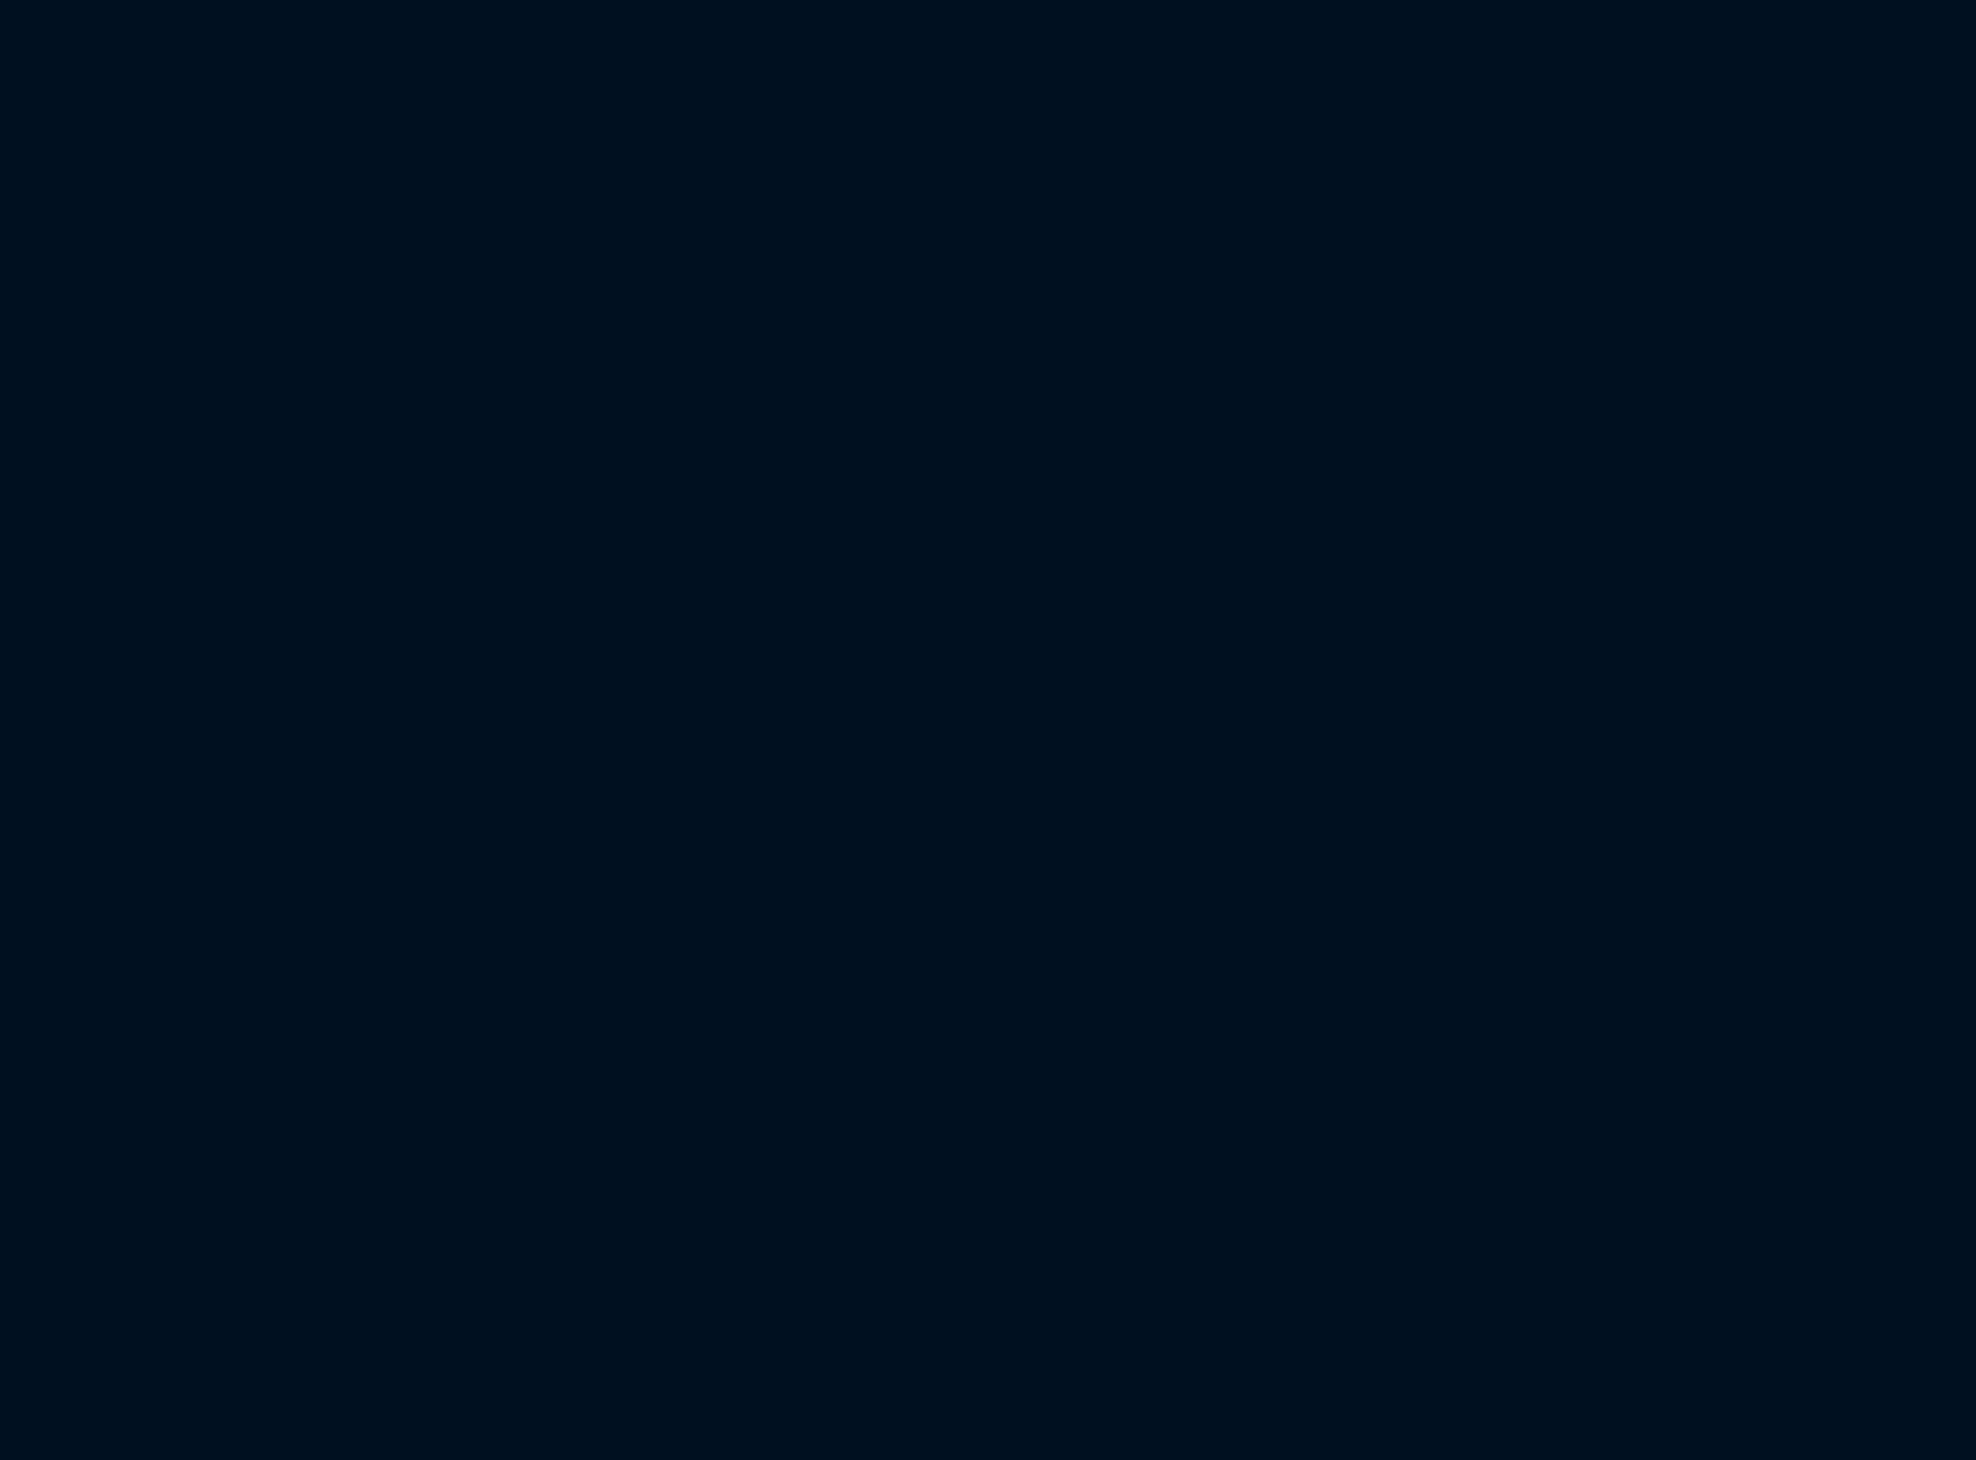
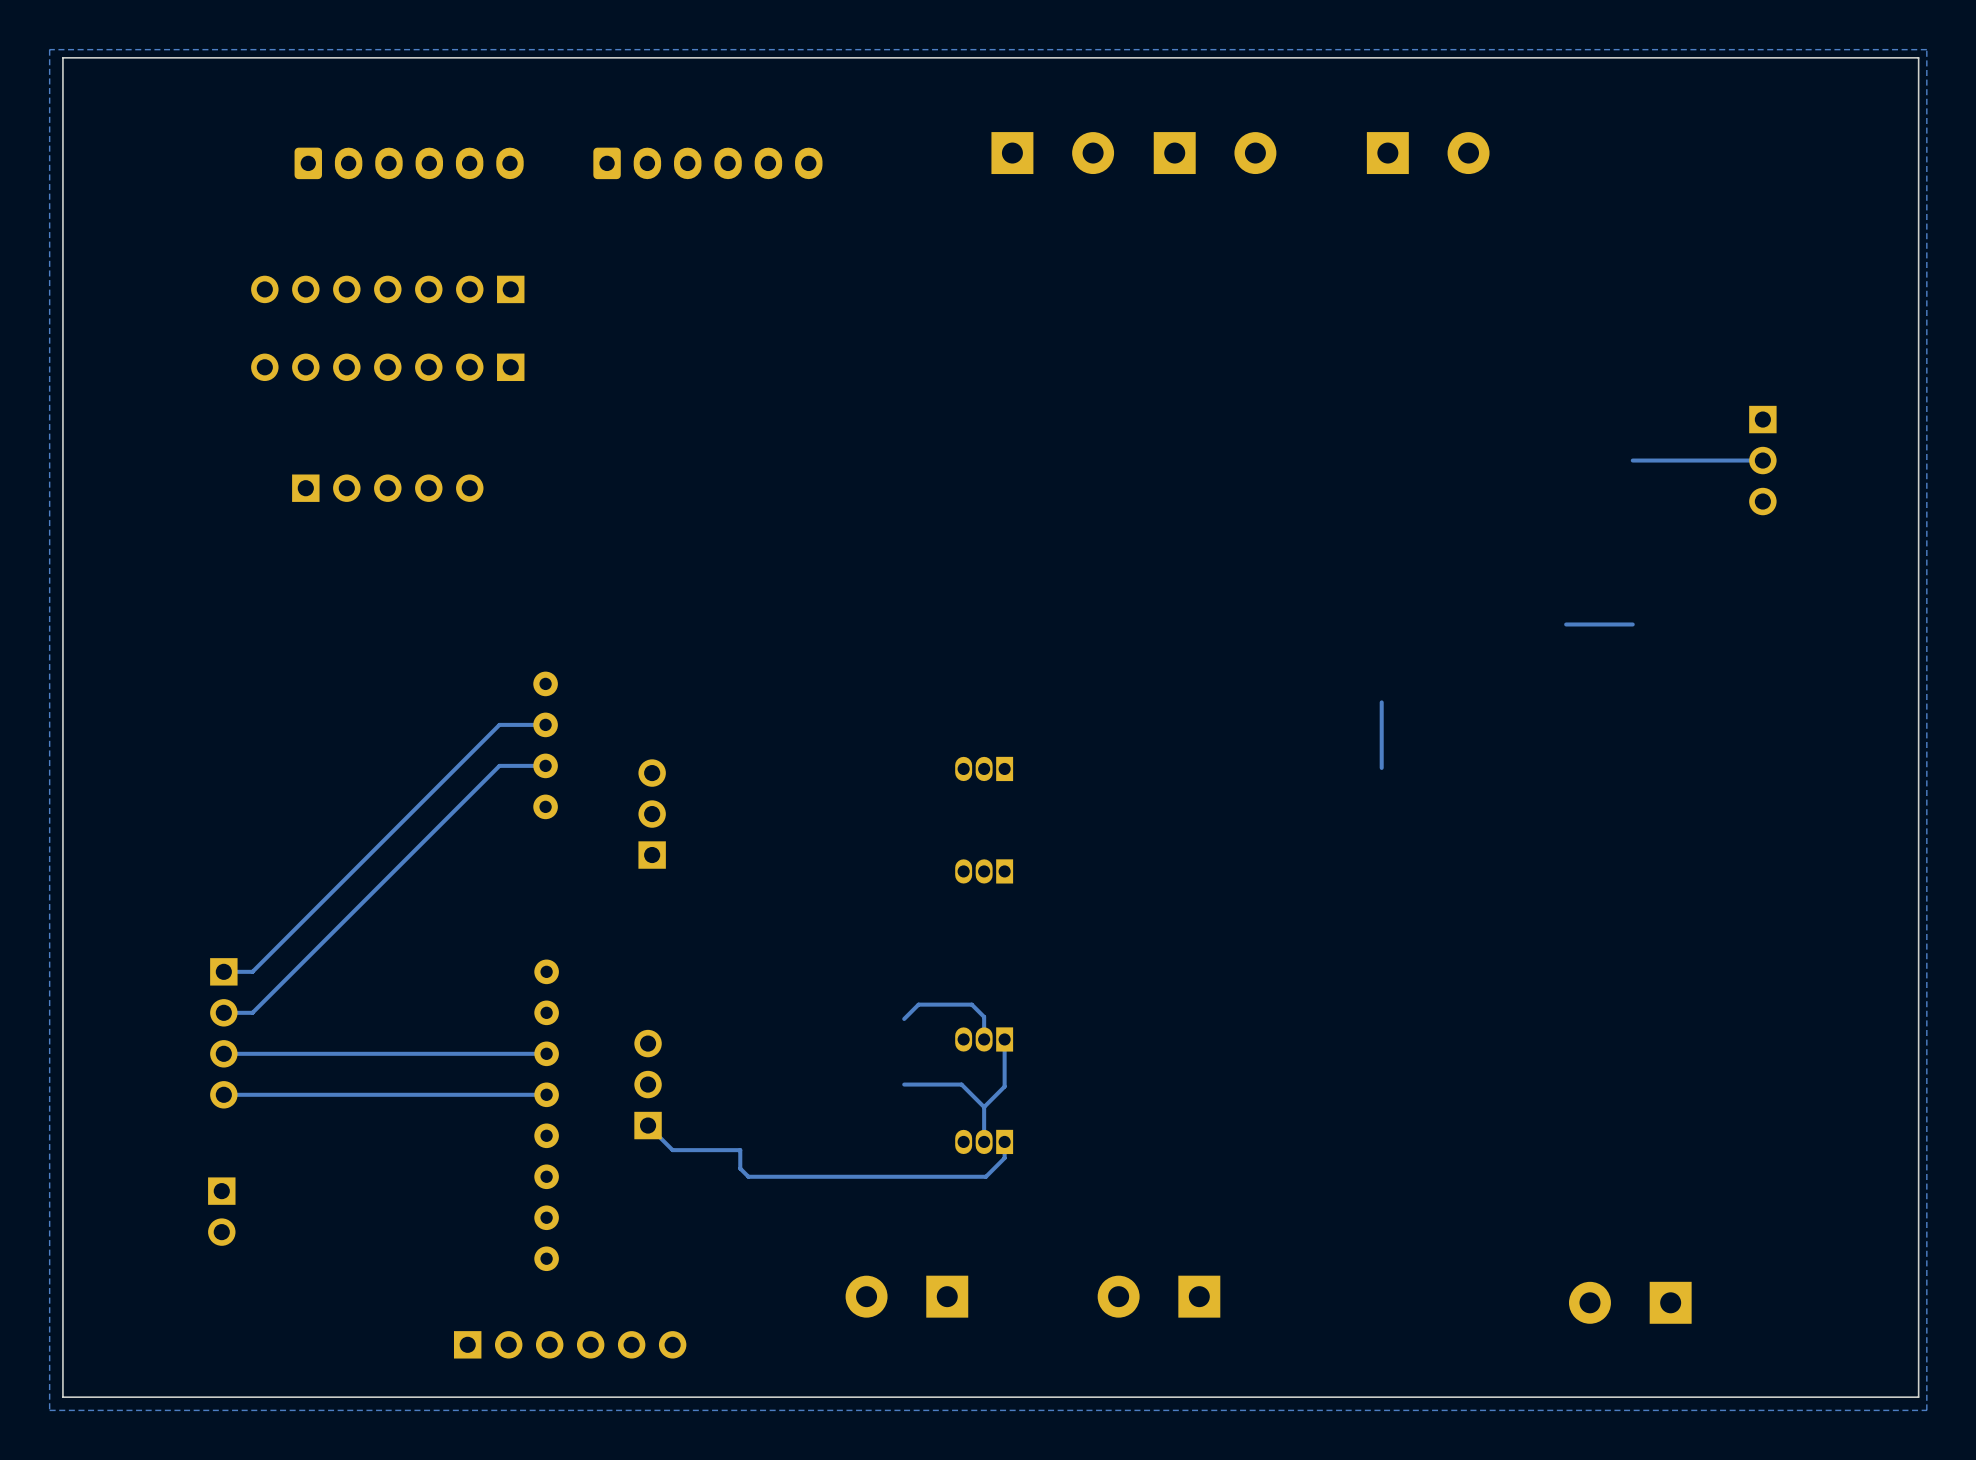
bottom zone outline: none -> (1926, 49) (1926, 1410) (49, 1410) (49, 49) (1926, 49)
board edge: none -> (1918, 57) (62, 57) (62, 1397) (1918, 1397) (1918, 57)
part: none -> (1052, 153)
part: none -> (1215, 153)
part: none -> (1428, 153)
part: none -> (409, 163)
part: none -> (707, 163)
part: none -> (387, 289)
part: none -> (387, 367)
bottom track: none -> (1762, 460) (1632, 460)
part: none -> (1762, 460)
part: none -> (387, 488)
bottom track: none -> (1632, 624) (1566, 624)
bottom track: none -> (1381, 702) (1381, 767)
bottom track: none -> (545, 724) (499, 724) (252, 971) (223, 971)
part: none -> (545, 745)
bottom track: none -> (545, 765) (499, 765) (252, 1012) (223, 1012)
part: none -> (984, 768)
part: none -> (652, 814)
part: none -> (984, 871)
bottom track: none -> (904, 1018) (918, 1004) (971, 1004) (984, 1016) (984, 1039)
part: none -> (223, 1033)
part: none -> (984, 1039)
bottom track: none -> (1004, 1039) (1004, 1086) (984, 1107)
bottom track: none -> (546, 1053) (223, 1053)
part: none -> (648, 1084)
bottom track: none -> (904, 1084) (961, 1084) (984, 1107)
bottom track: none -> (546, 1094) (223, 1094)
bottom track: none -> (984, 1107) (984, 1141)
part: none -> (546, 1115)
bottom track: none -> (648, 1125) (672, 1150) (740, 1150) (740, 1168) (748, 1176) (985, 1176) (1004, 1158) (1004, 1141)
part: none -> (984, 1141)
part: none -> (221, 1211)
part: none -> (906, 1296)
part: none -> (1158, 1296)
part: none -> (1630, 1302)
part: none -> (570, 1344)

